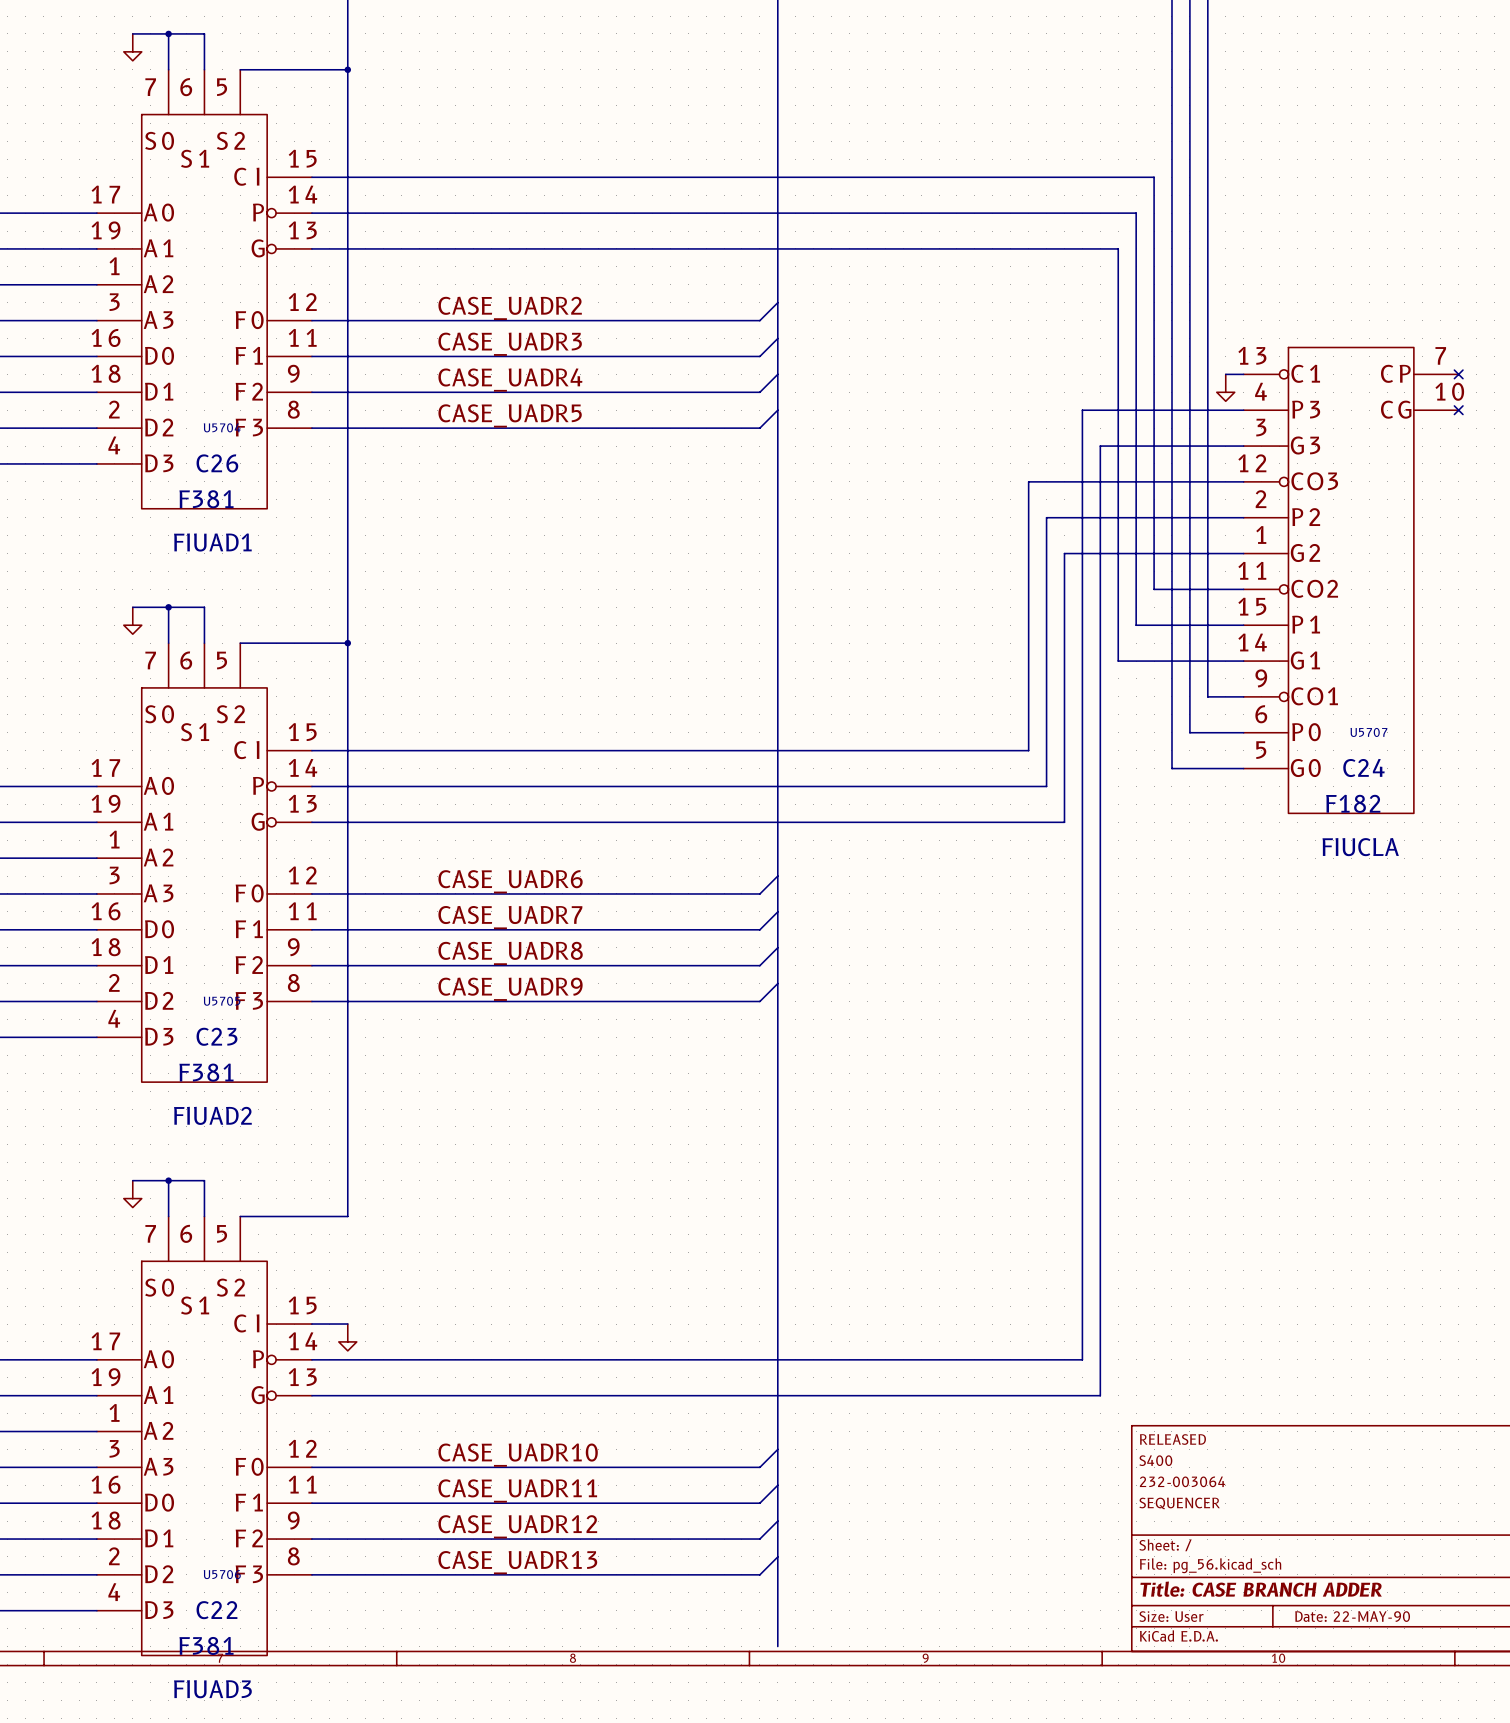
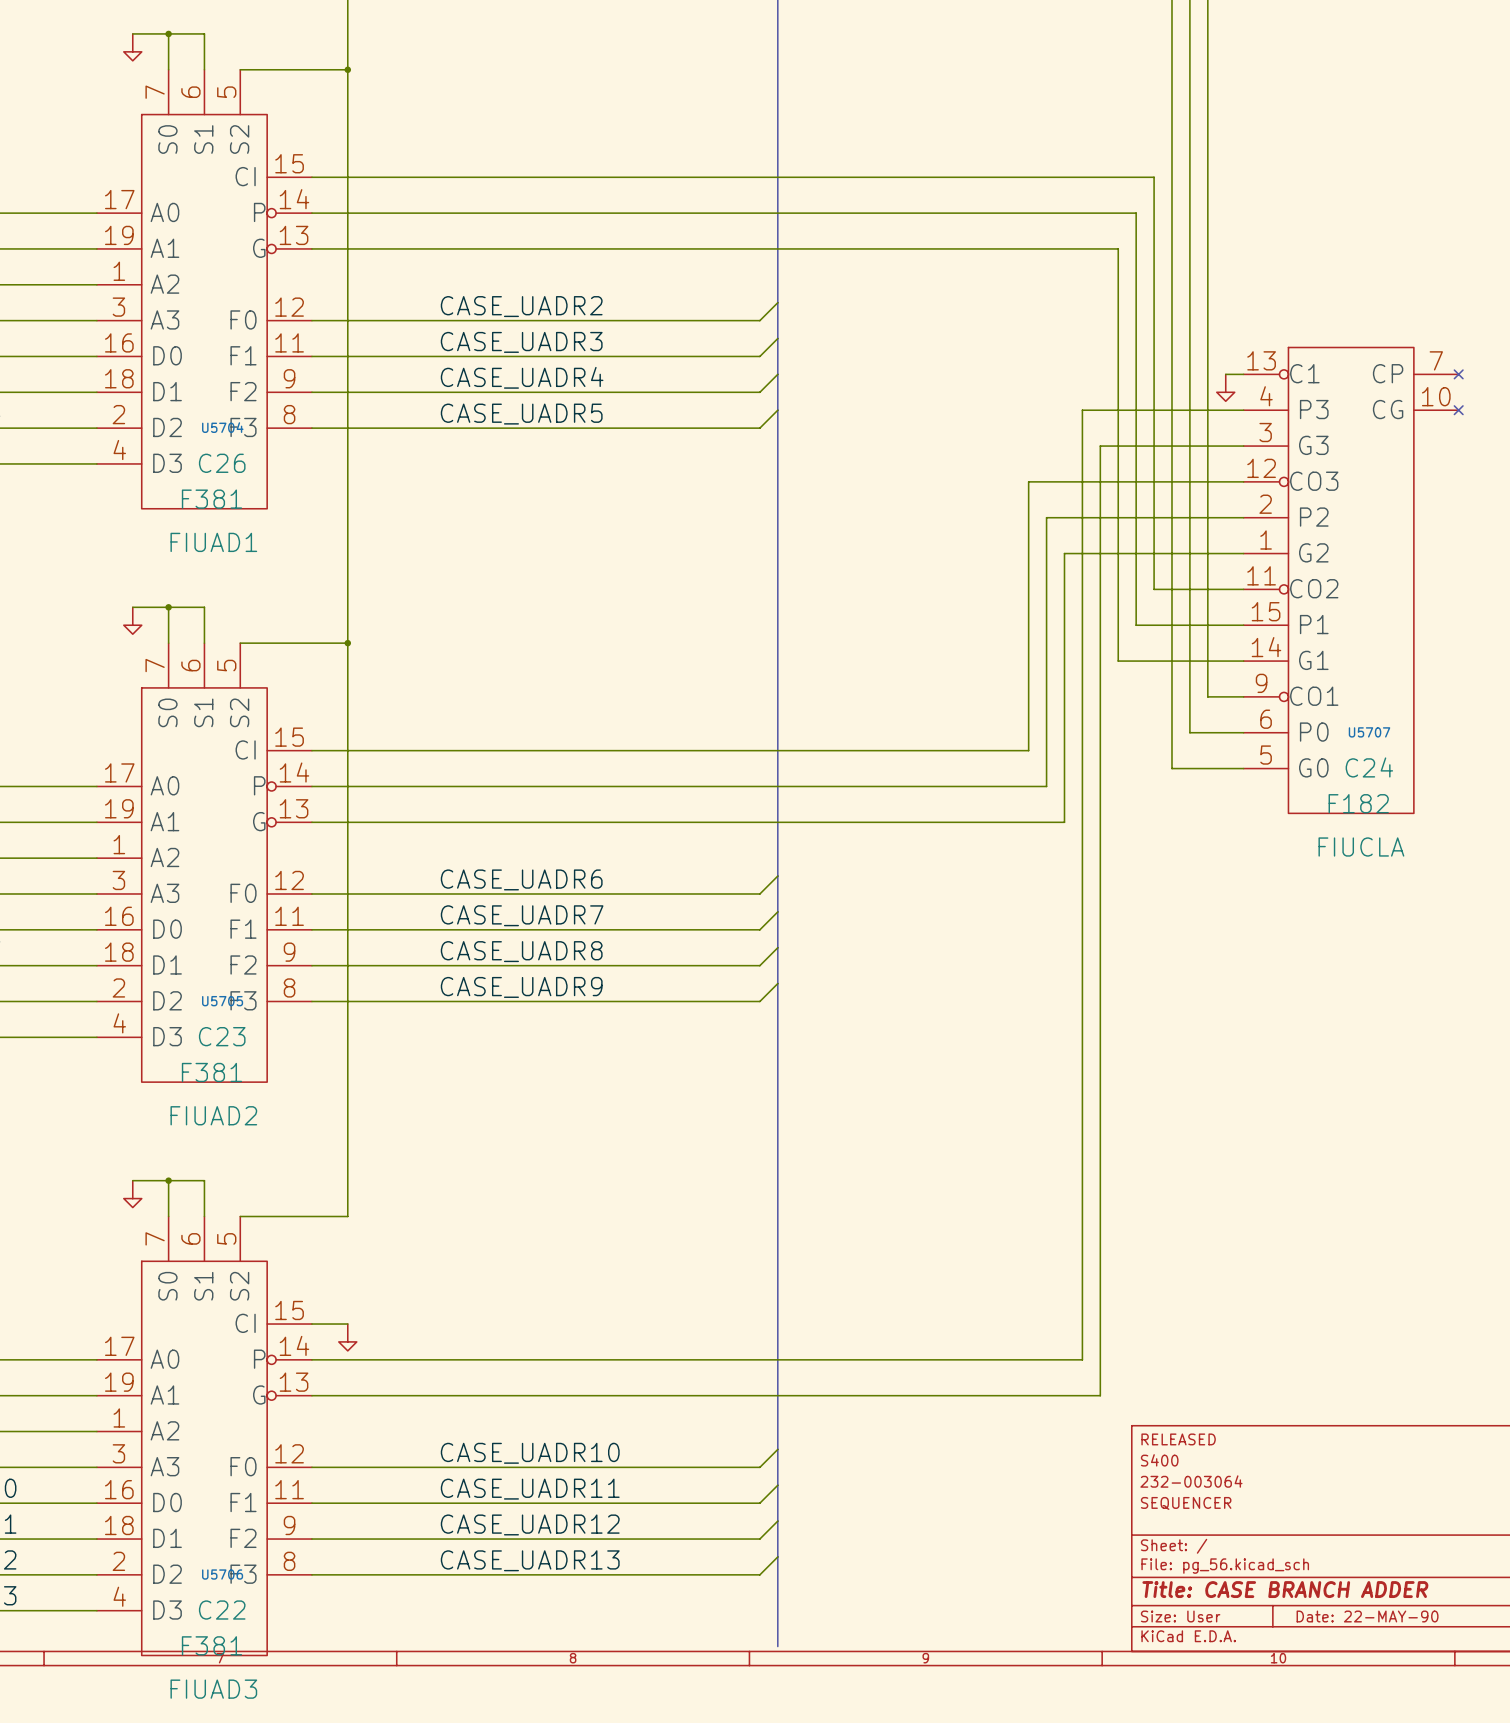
U5704 symbol: [96, 69, 312, 509] -> [96, 69, 312, 509]
U5707 symbol: [1243, 347, 1459, 814] -> [1243, 347, 1459, 814]
U5705 symbol: [96, 643, 312, 1083] -> [96, 643, 312, 1083]
U5706 symbol: [96, 1216, 312, 1656] -> [96, 1216, 312, 1656]

